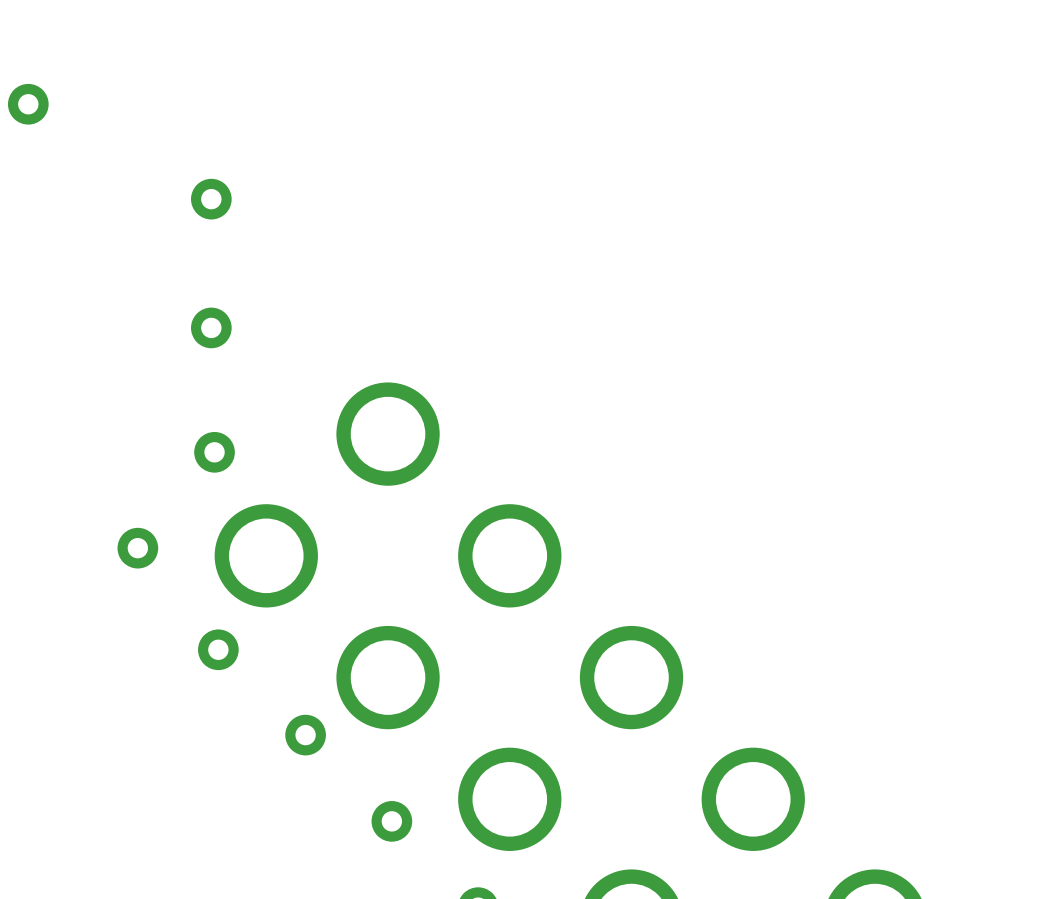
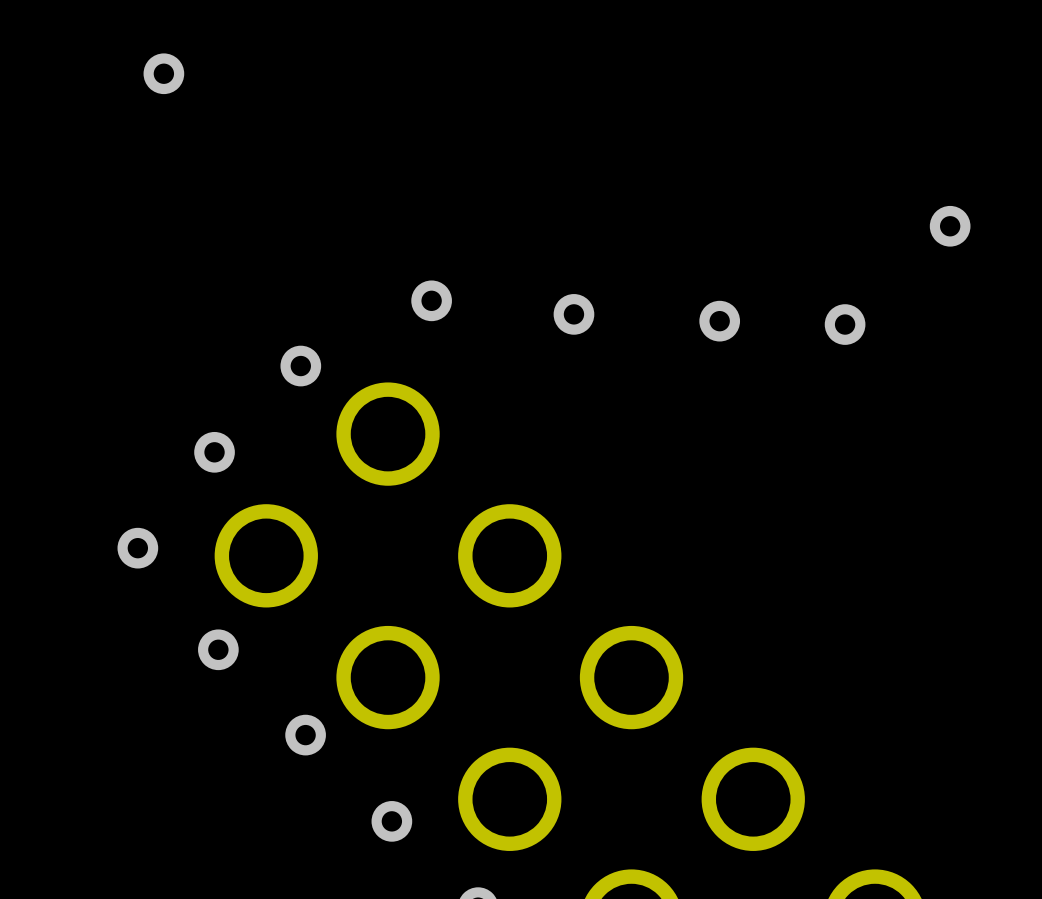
via: none -> (163, 73)
via: (28, 104) -> none
via: (211, 199) -> none
via: none -> (950, 226)
via: none -> (431, 300)
via: none -> (573, 314)
via: none -> (719, 321)
via: none -> (845, 324)
via: (211, 327) -> none
via: none -> (300, 366)

